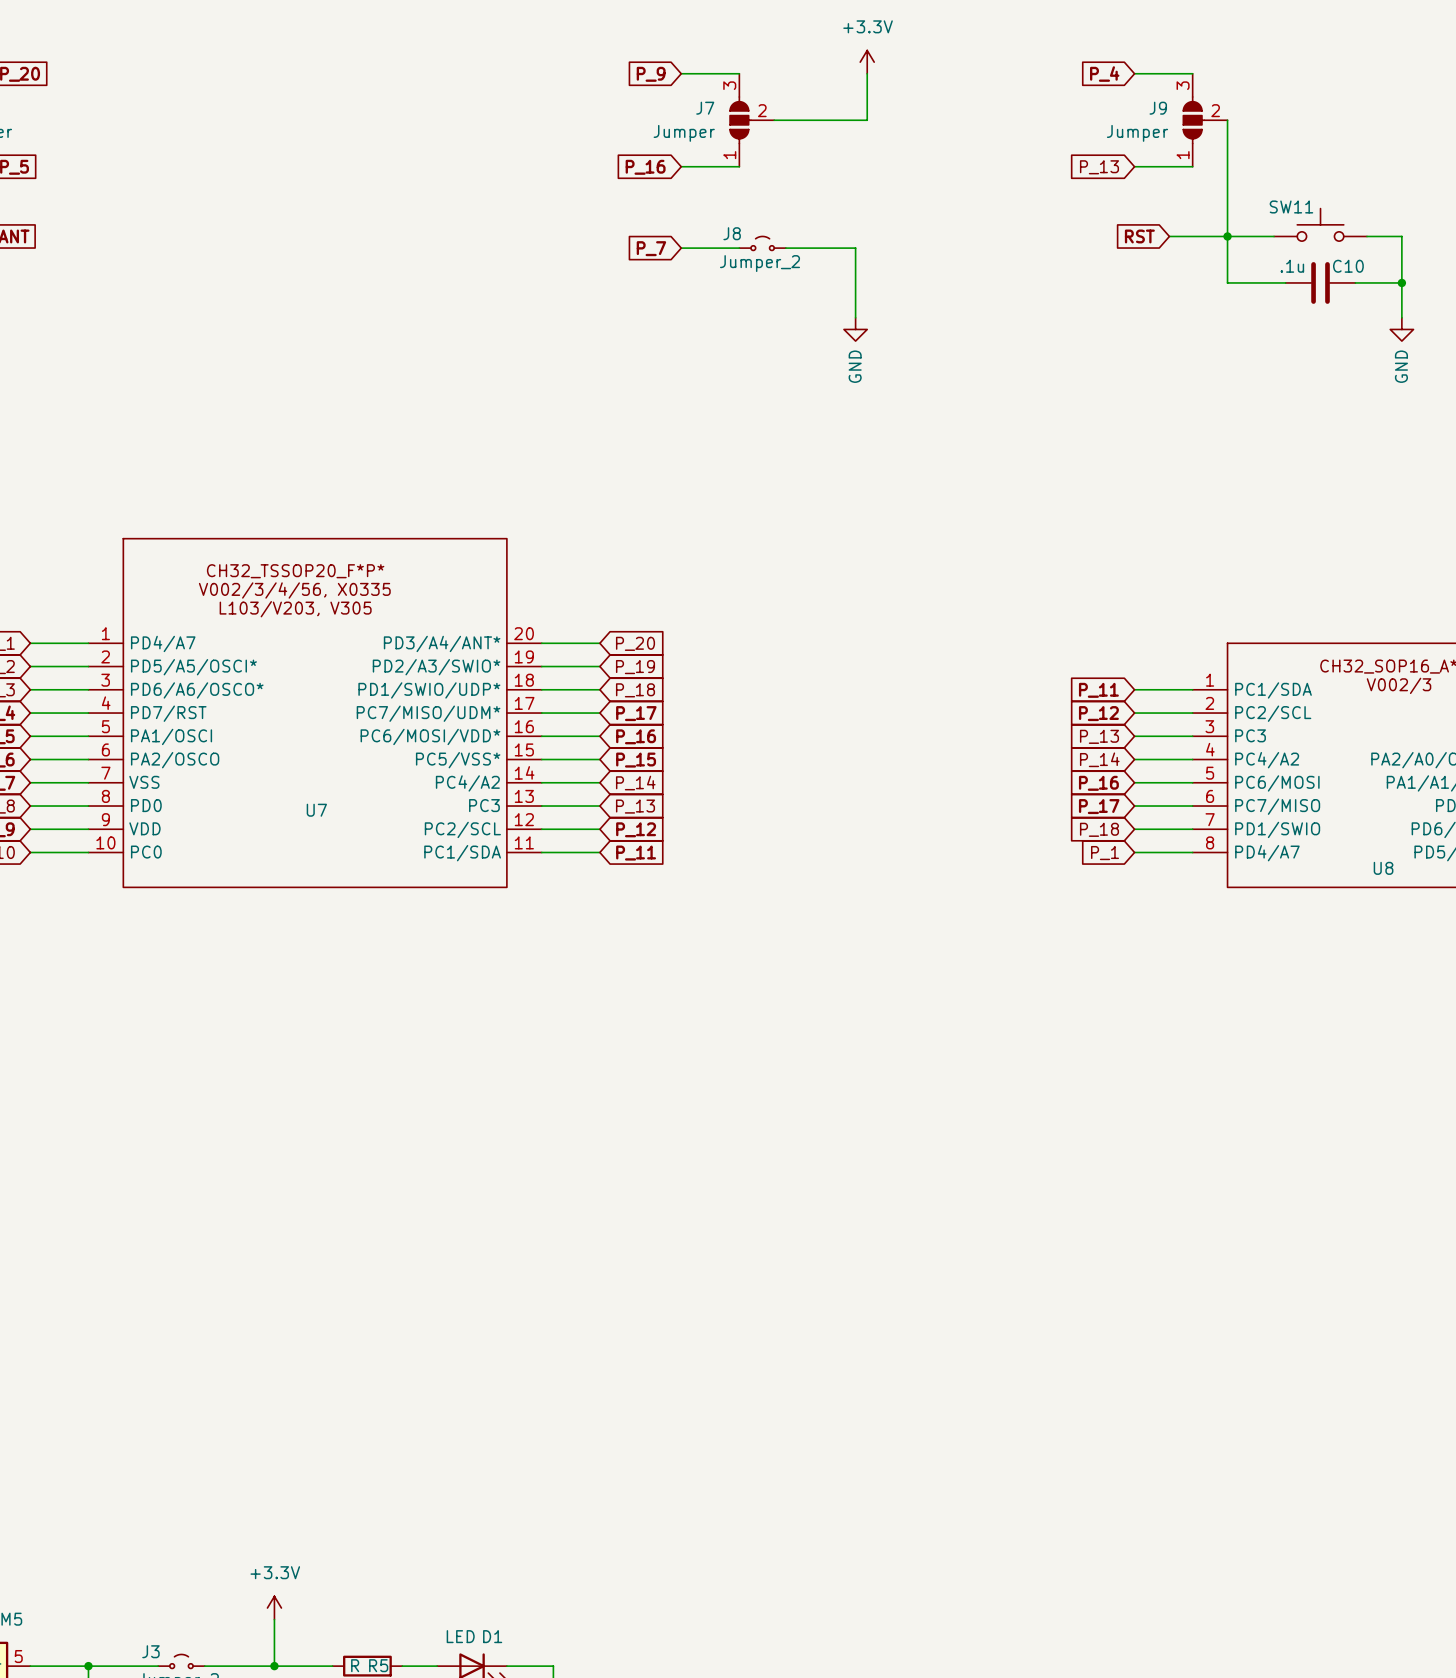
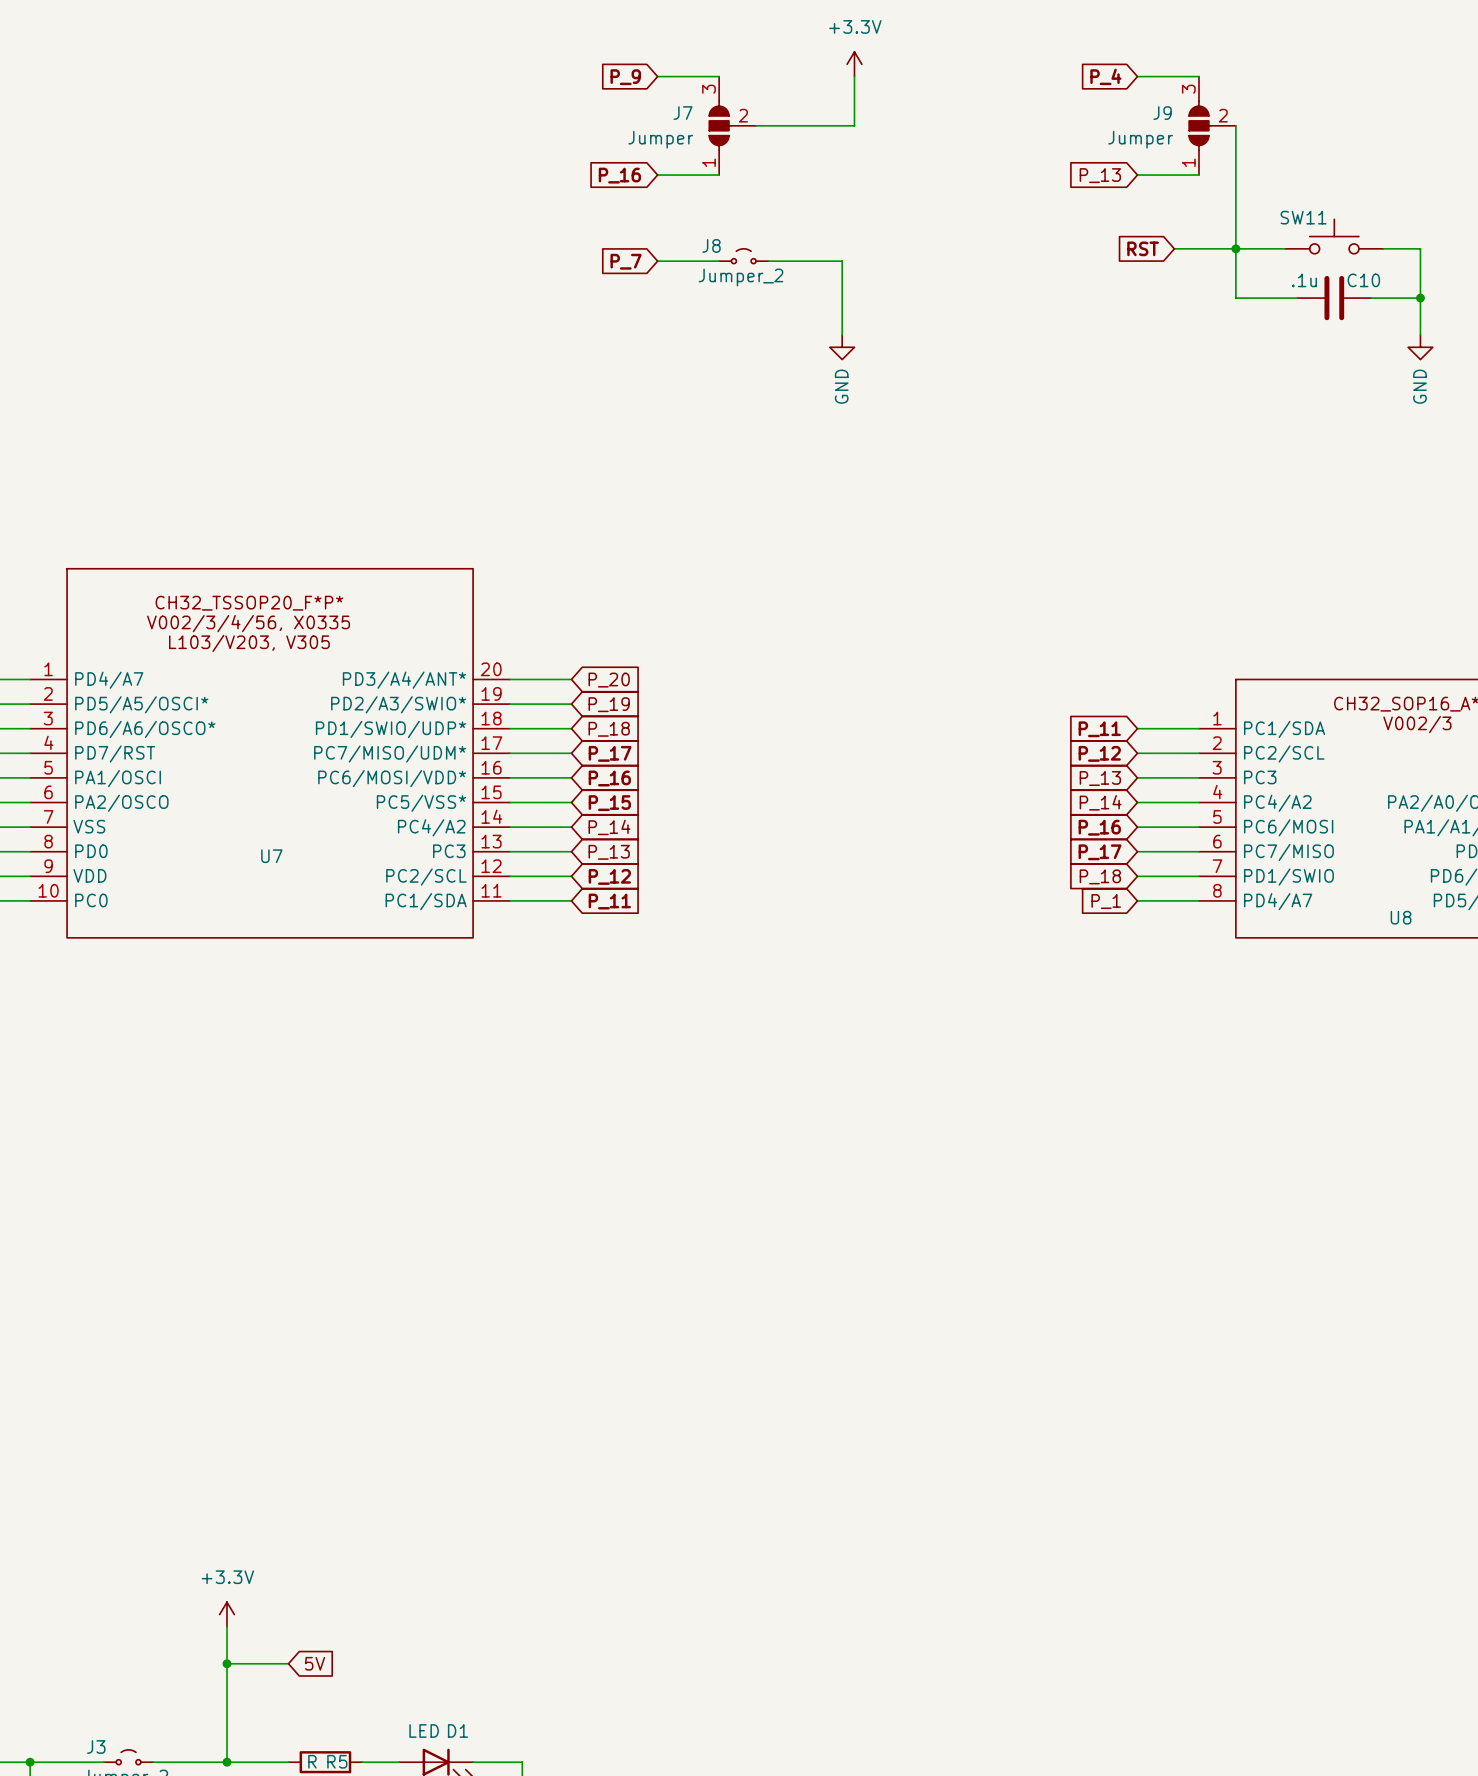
wire: none -> (226, 1626) (226, 1712)
wire: none -> (226, 1663) (288, 1663)
junction: none -> (226, 1663)
global label: none -> 5V (315, 1663)
power symbol position: +3.3V (274, 1608) -> +3.3V (226, 1614)

